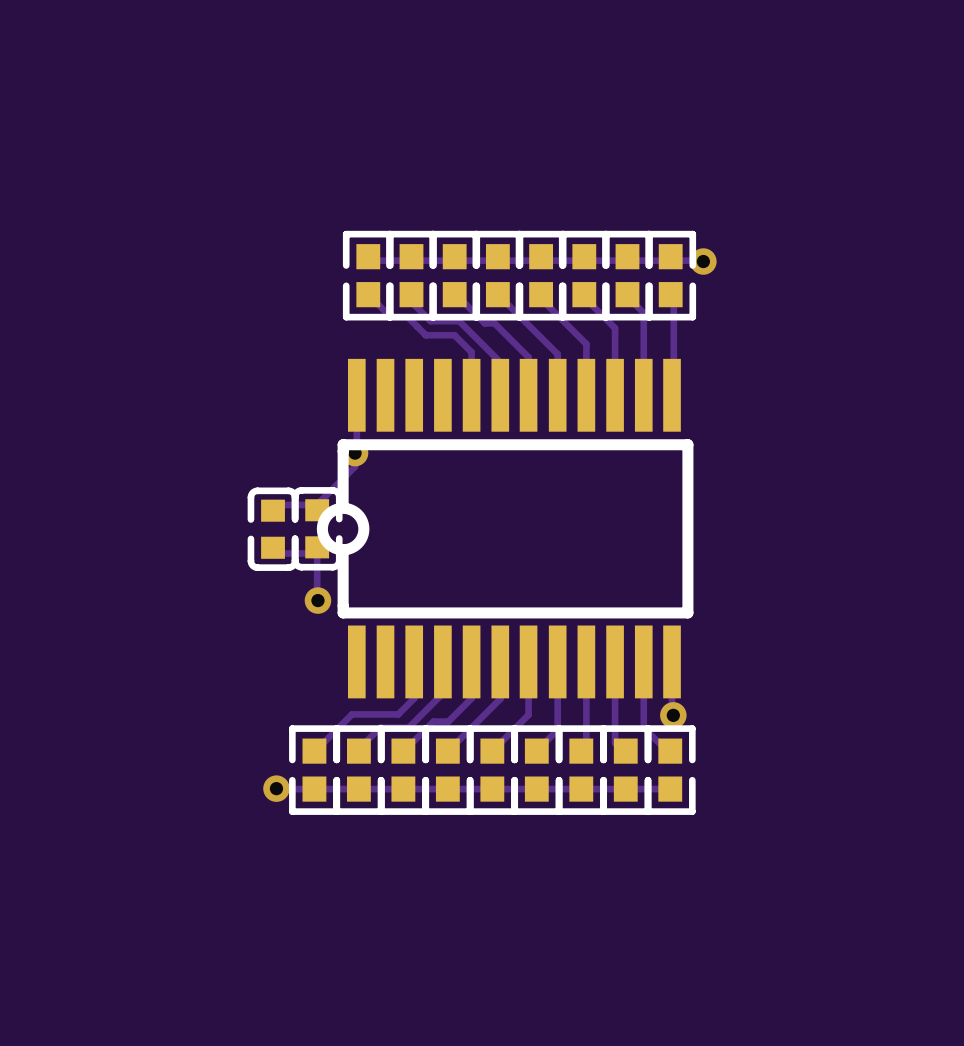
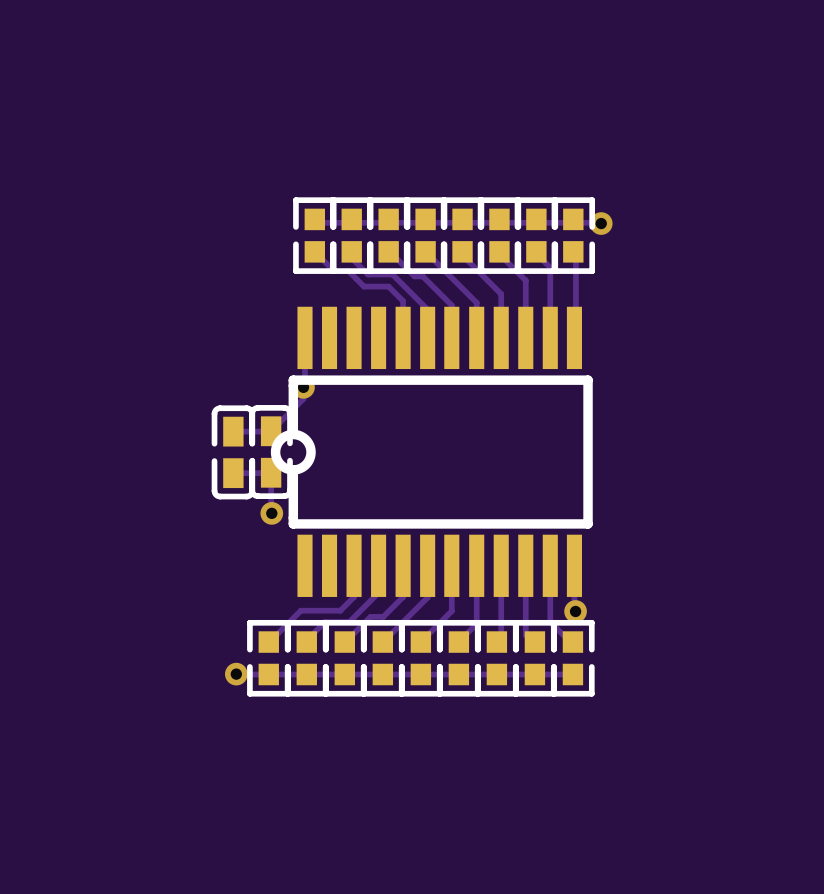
part footprint: [247, 487, 299, 571] -> [211, 405, 256, 500]
part footprint: [291, 487, 343, 571] -> [249, 405, 293, 499]

